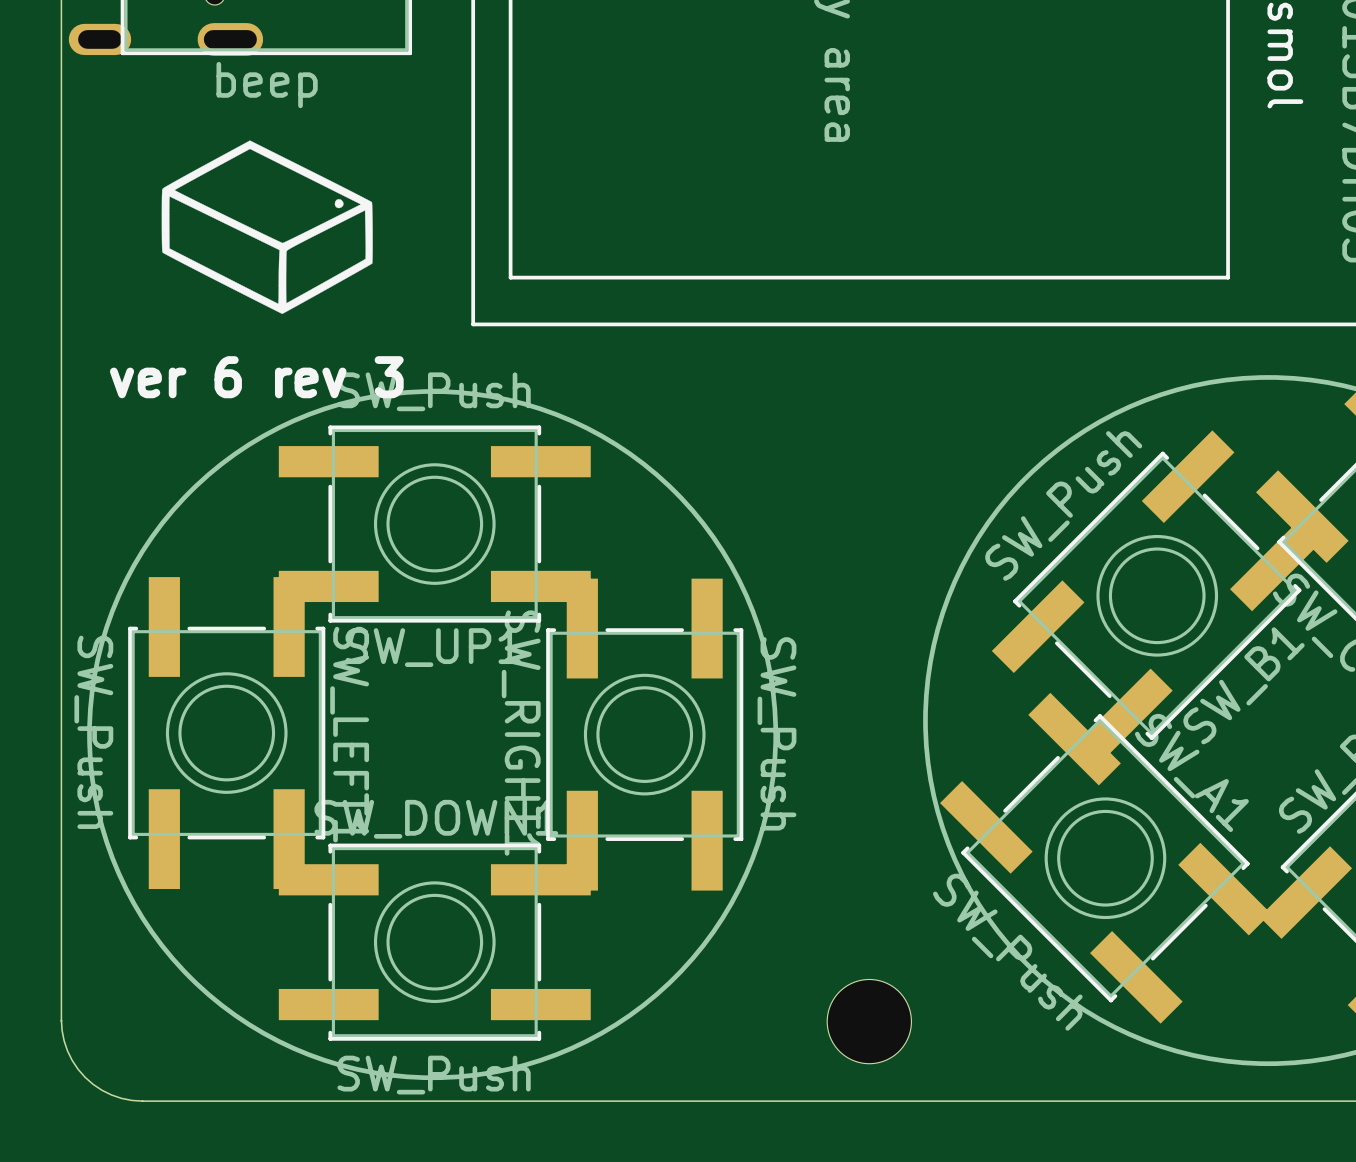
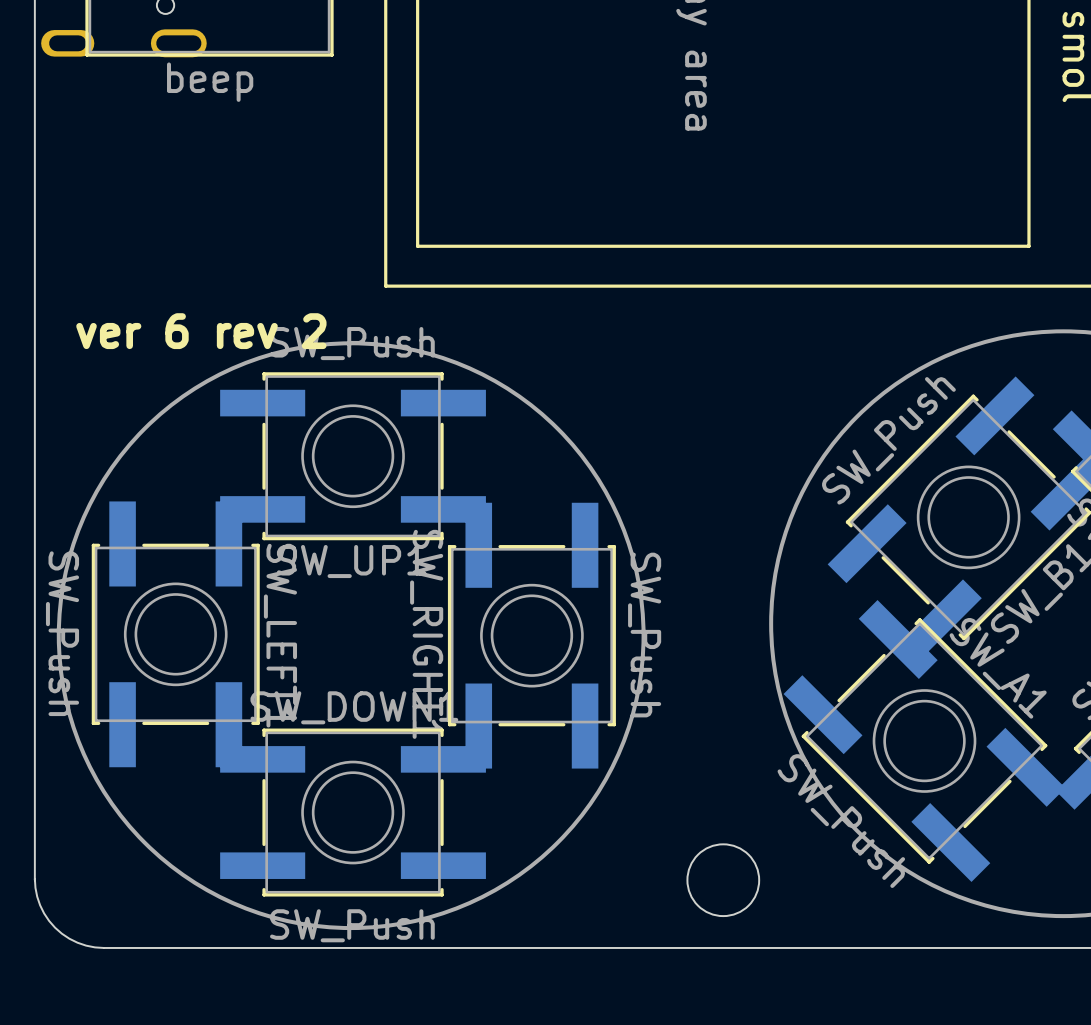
drawing: [161, 140, 373, 314] -> none
text: ver 6 rev 3 (256, 377) -> ver 6 rev 2 (201, 331)

